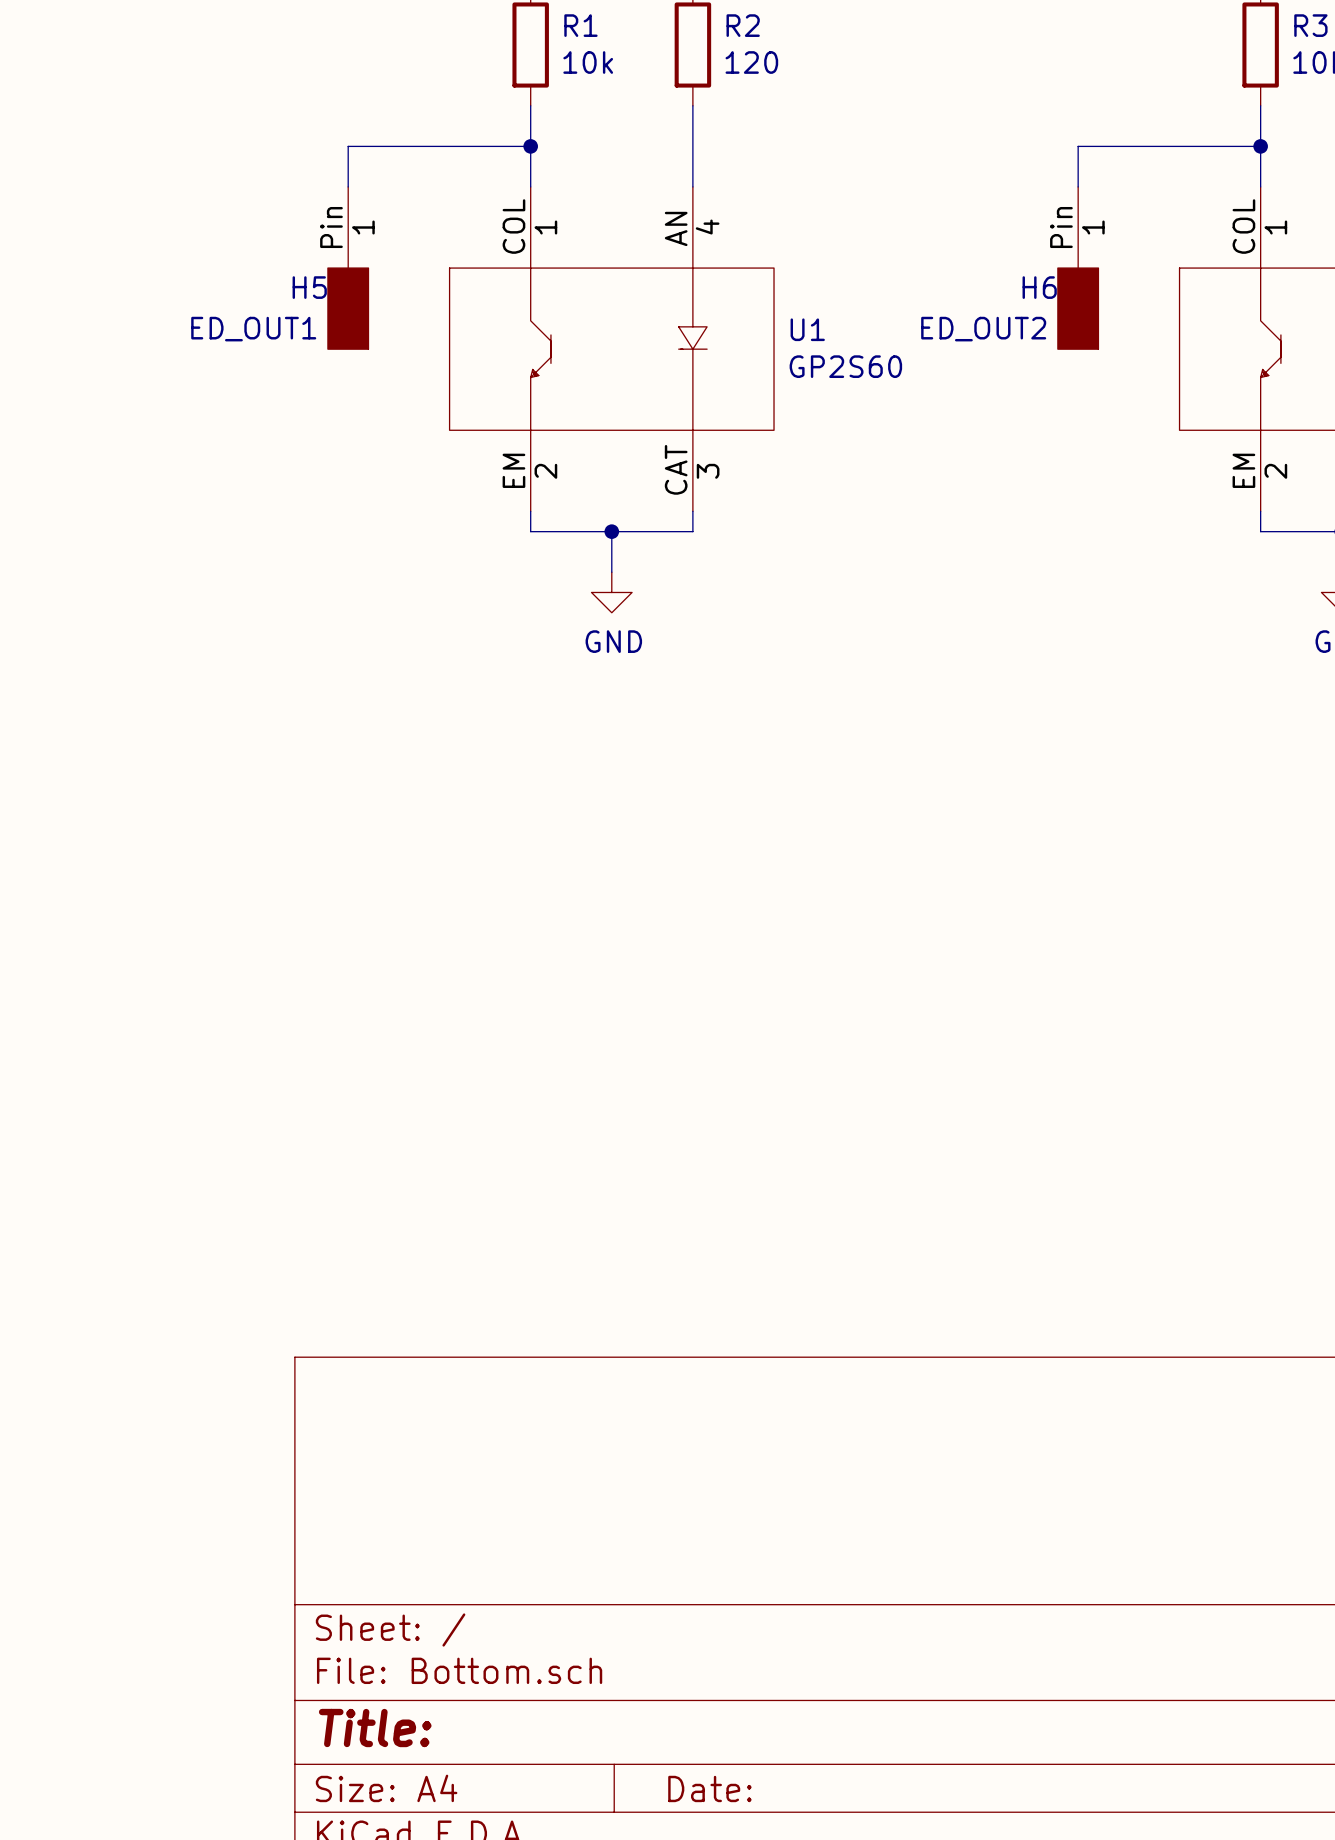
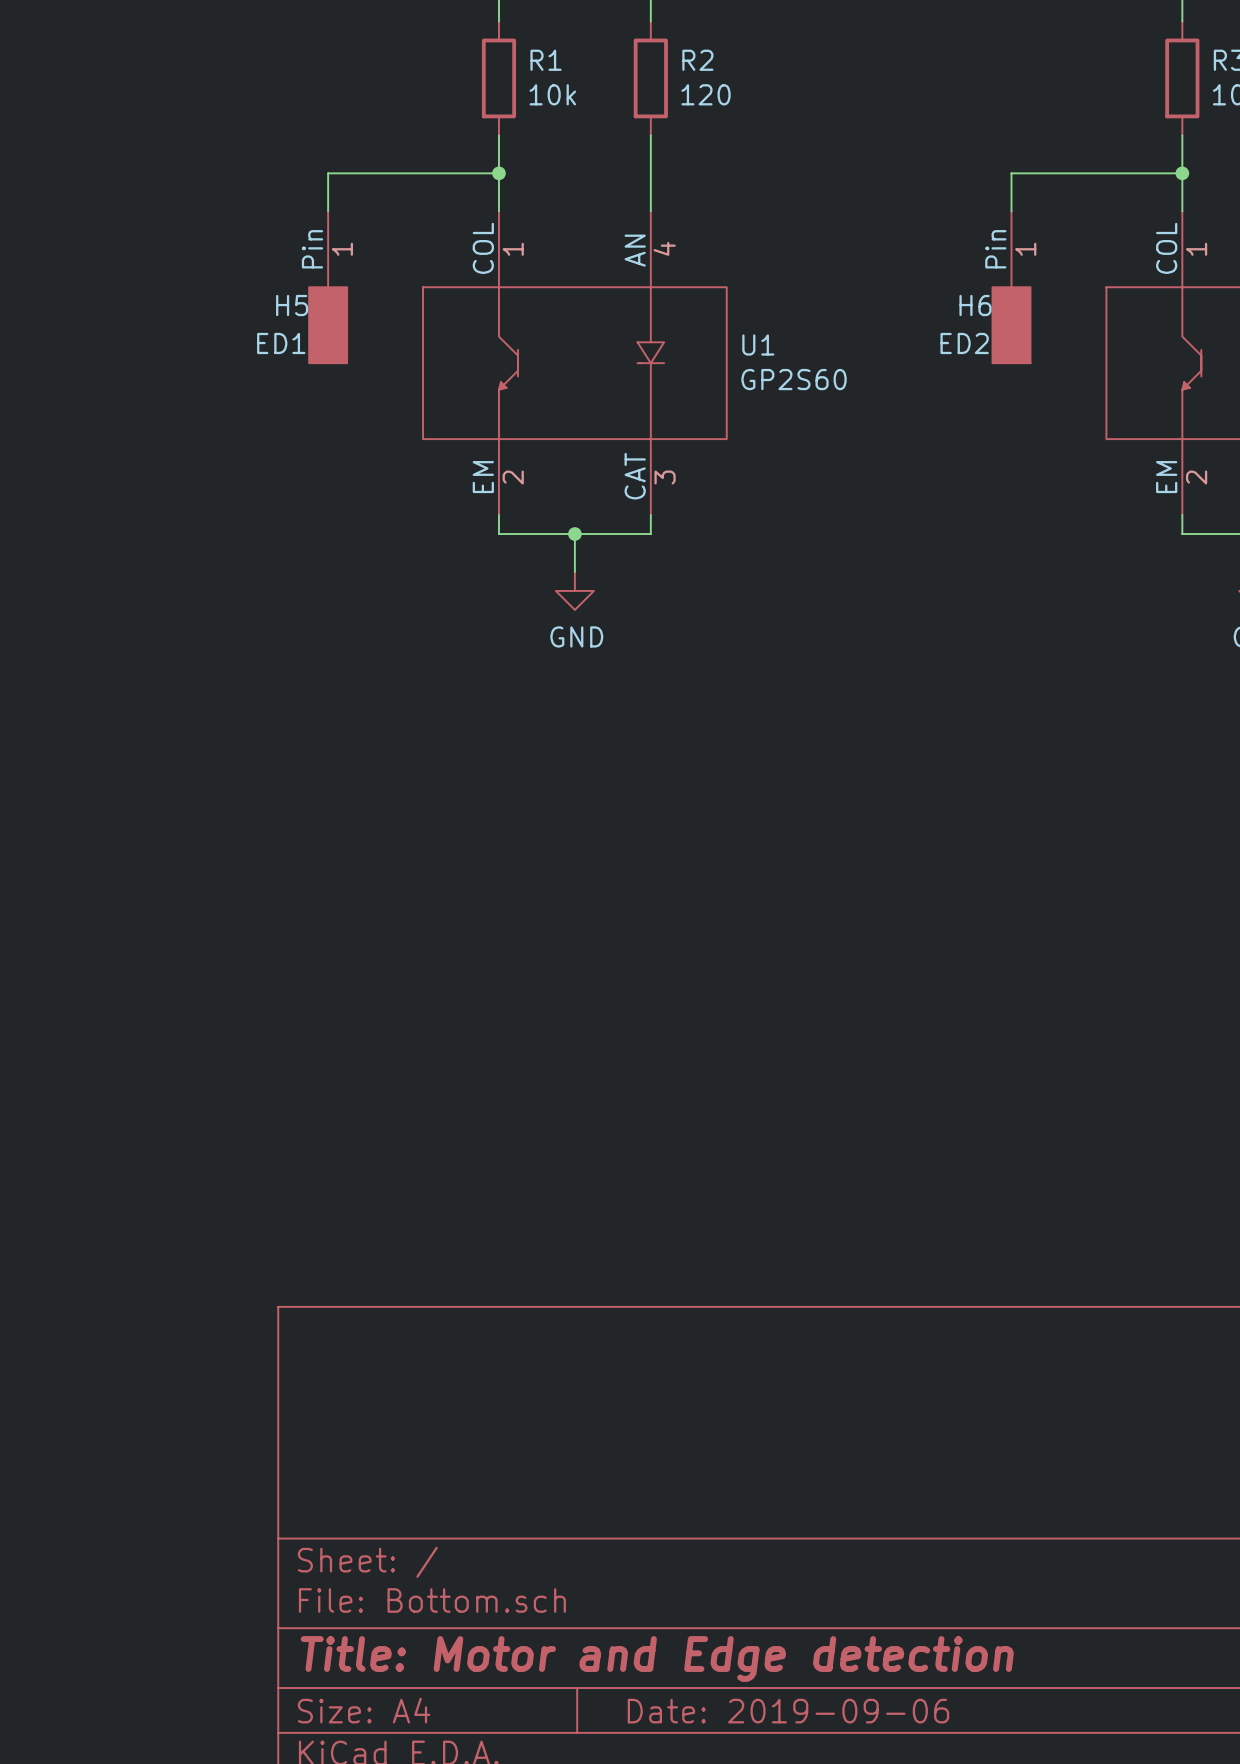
H5 value: ED_OUT1 (253, 329) -> ED1 (281, 343)
H6 value: ED_OUT2 (983, 329) -> ED2 (964, 343)
title block: Title: (375, 1728) -> Title: Motor and Edge detection (657, 1659)
title block: Date: (709, 1788) -> Date: 2019-09-06 (788, 1711)

